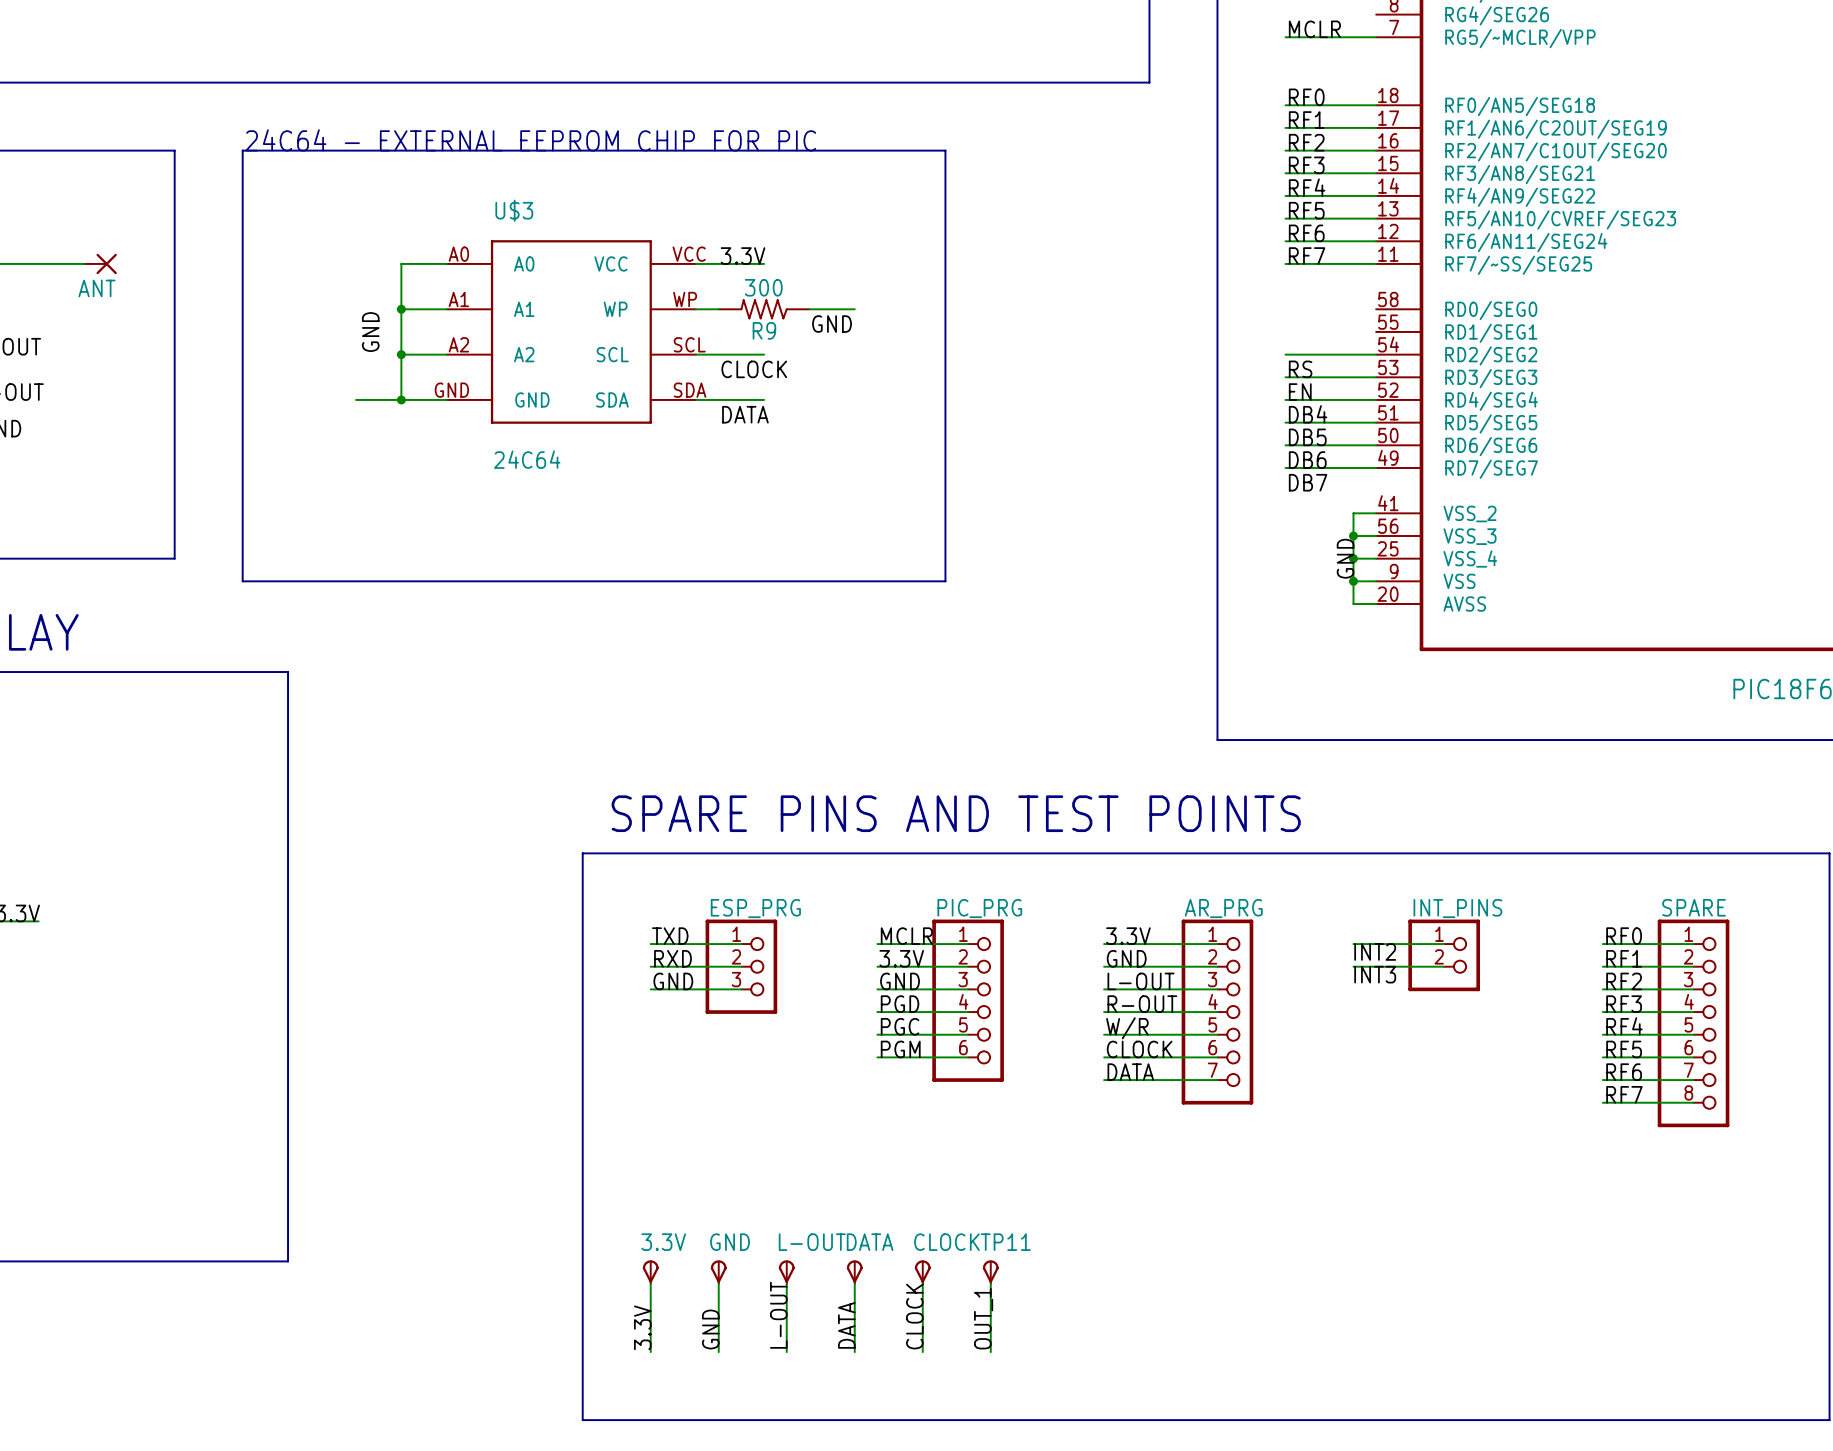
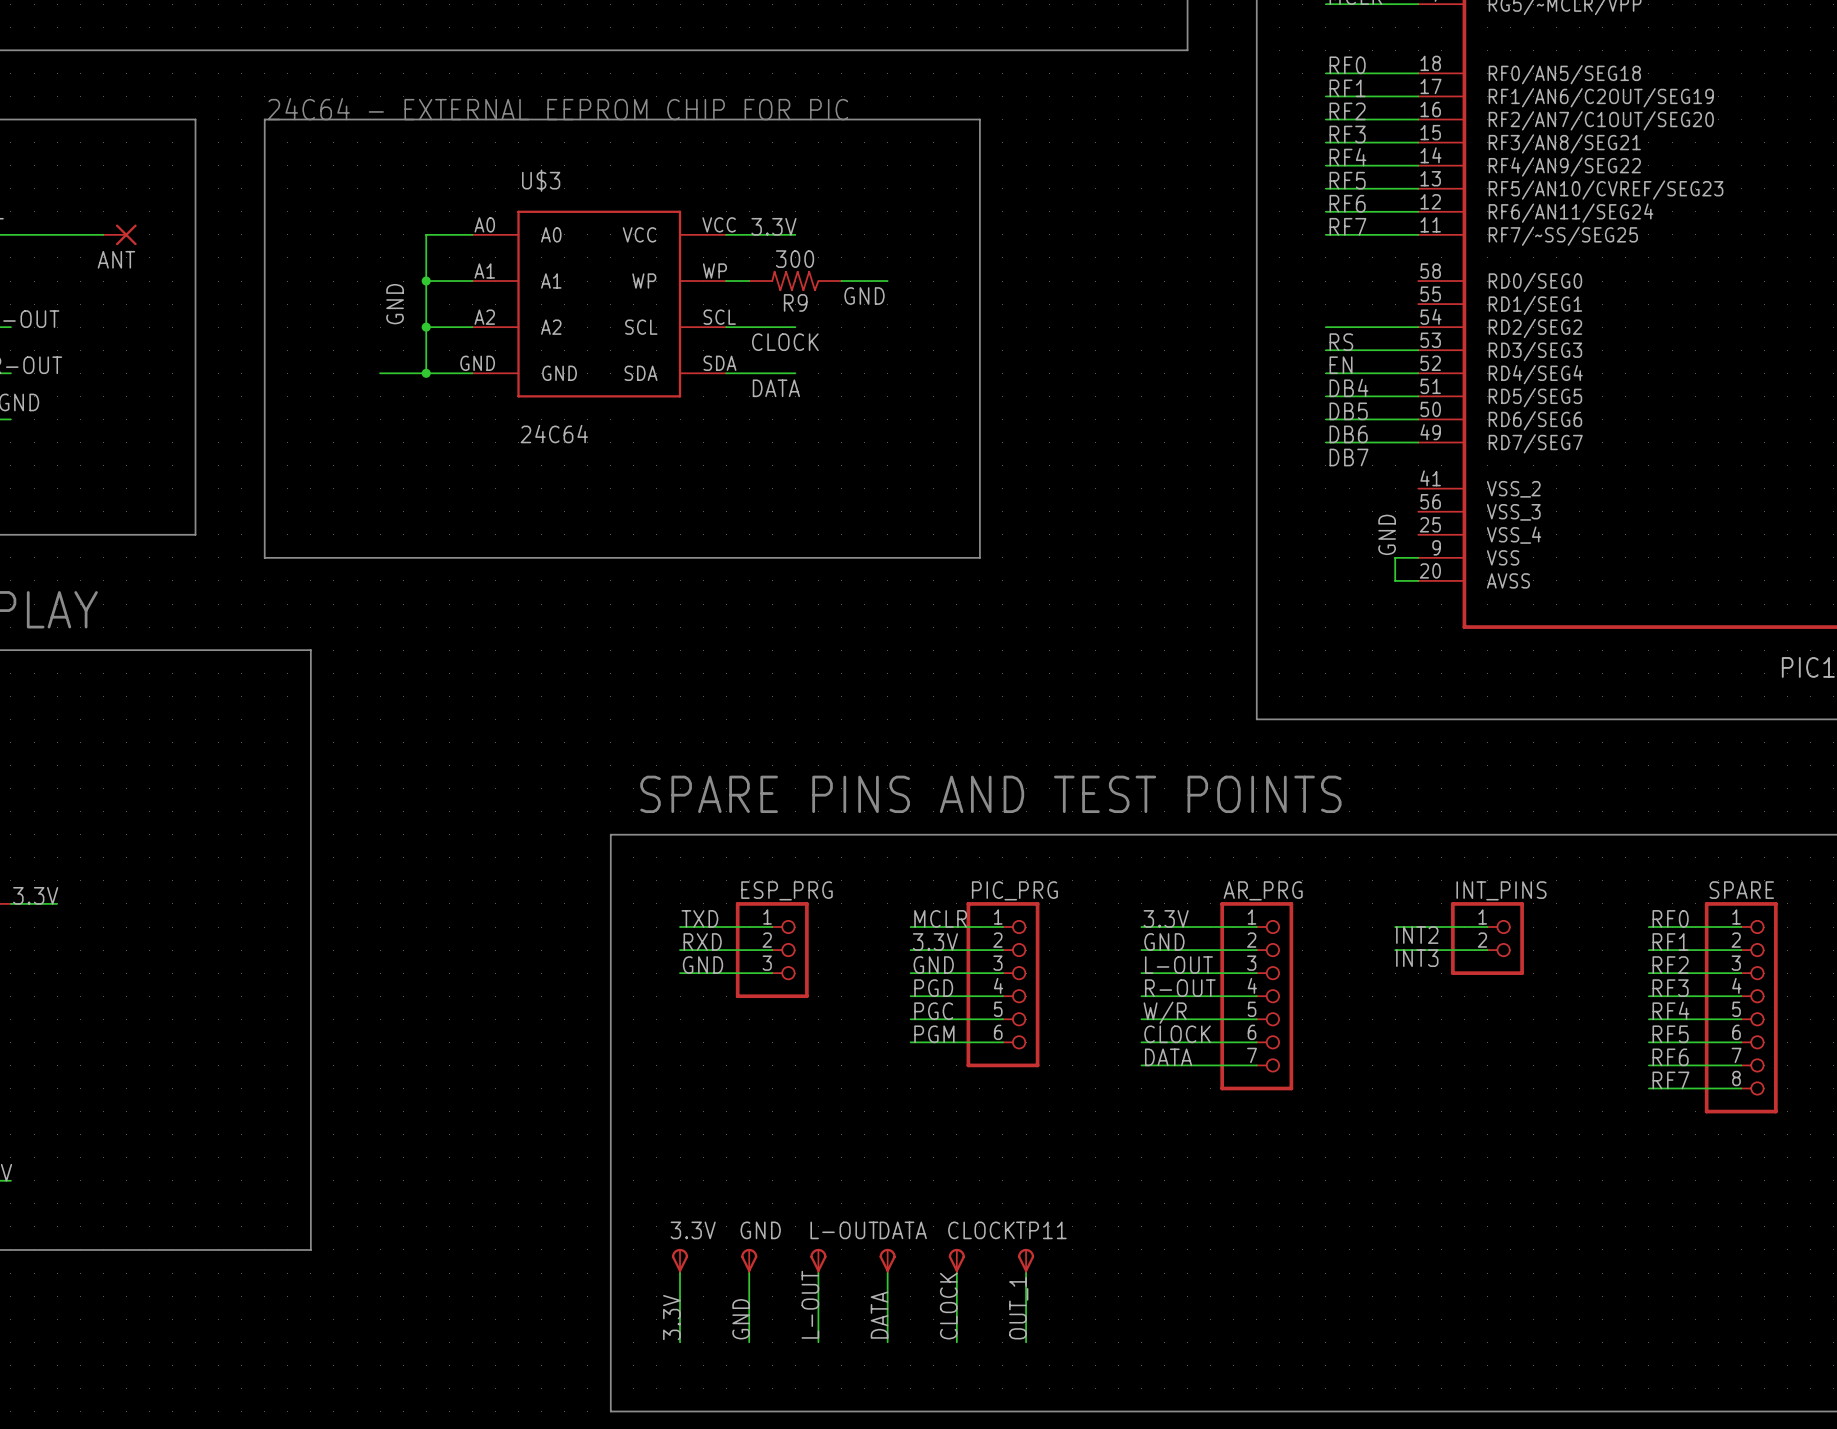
wire: (1376, 513) (1353, 513) (1353, 581) -> none
wire: (1353, 535) (1376, 535) -> none
junction: (1353, 535) -> none
wire: (1353, 558) (1376, 558) -> none
junction: (1353, 558) -> none
junction: (1353, 581) -> none

